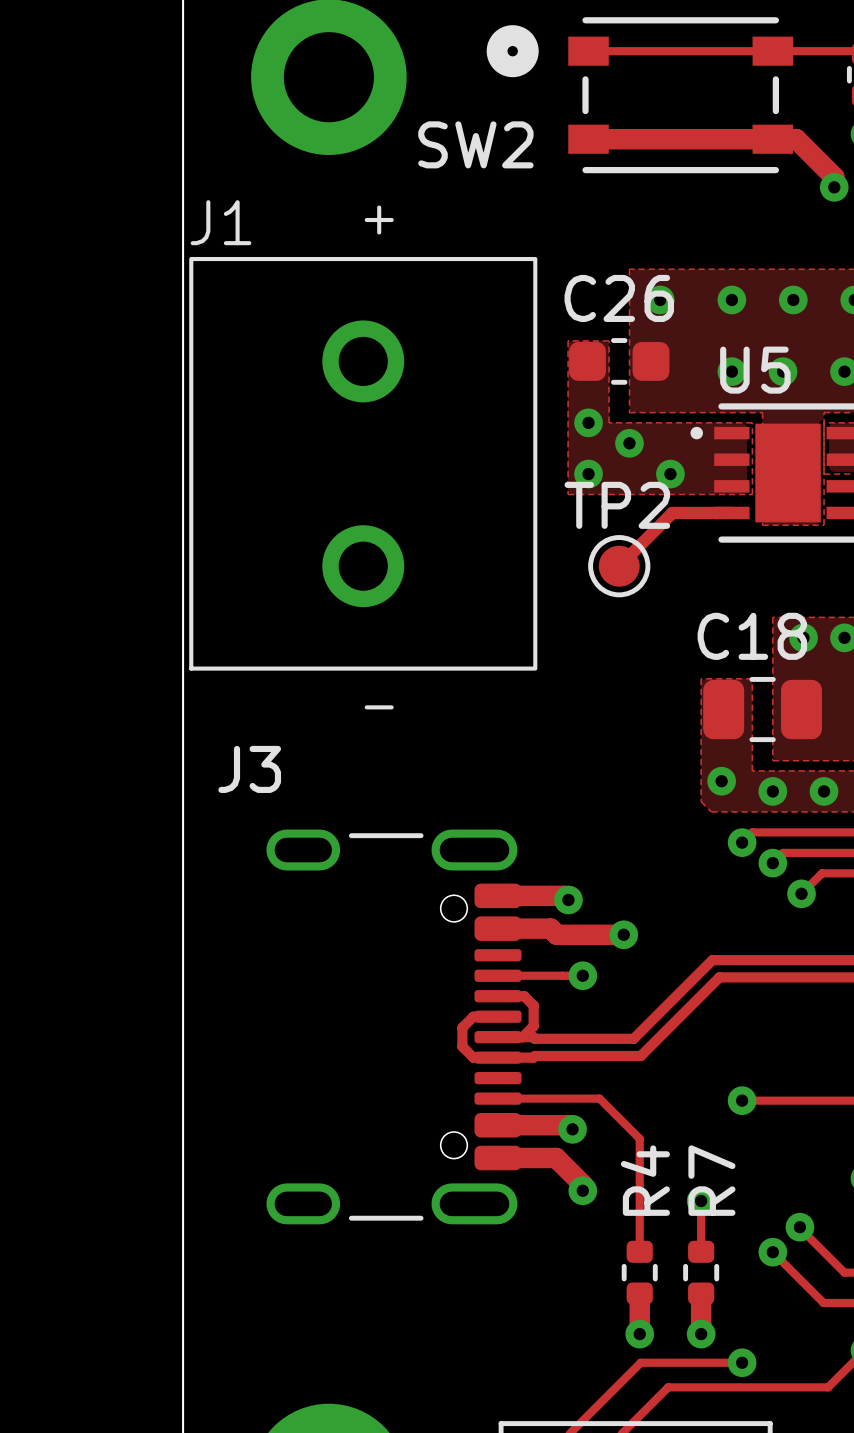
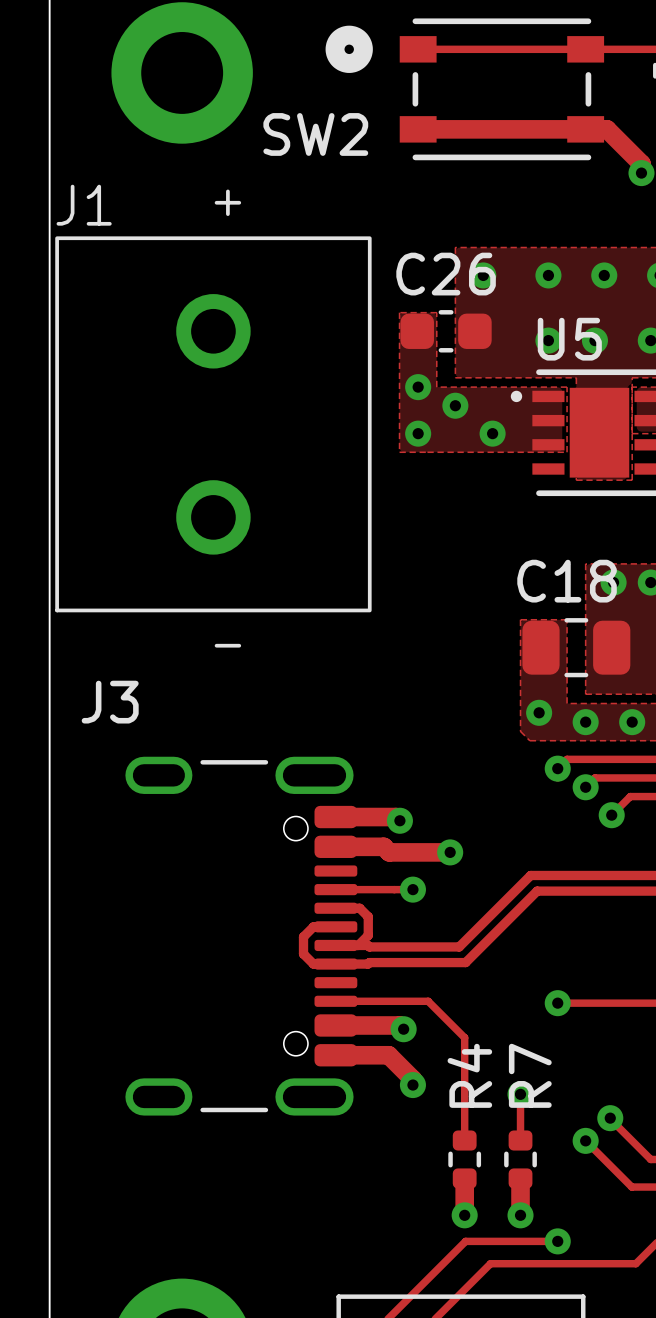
track: (731, 512) (672, 512) (619, 566) -> none
TP2: (619, 566) -> none

